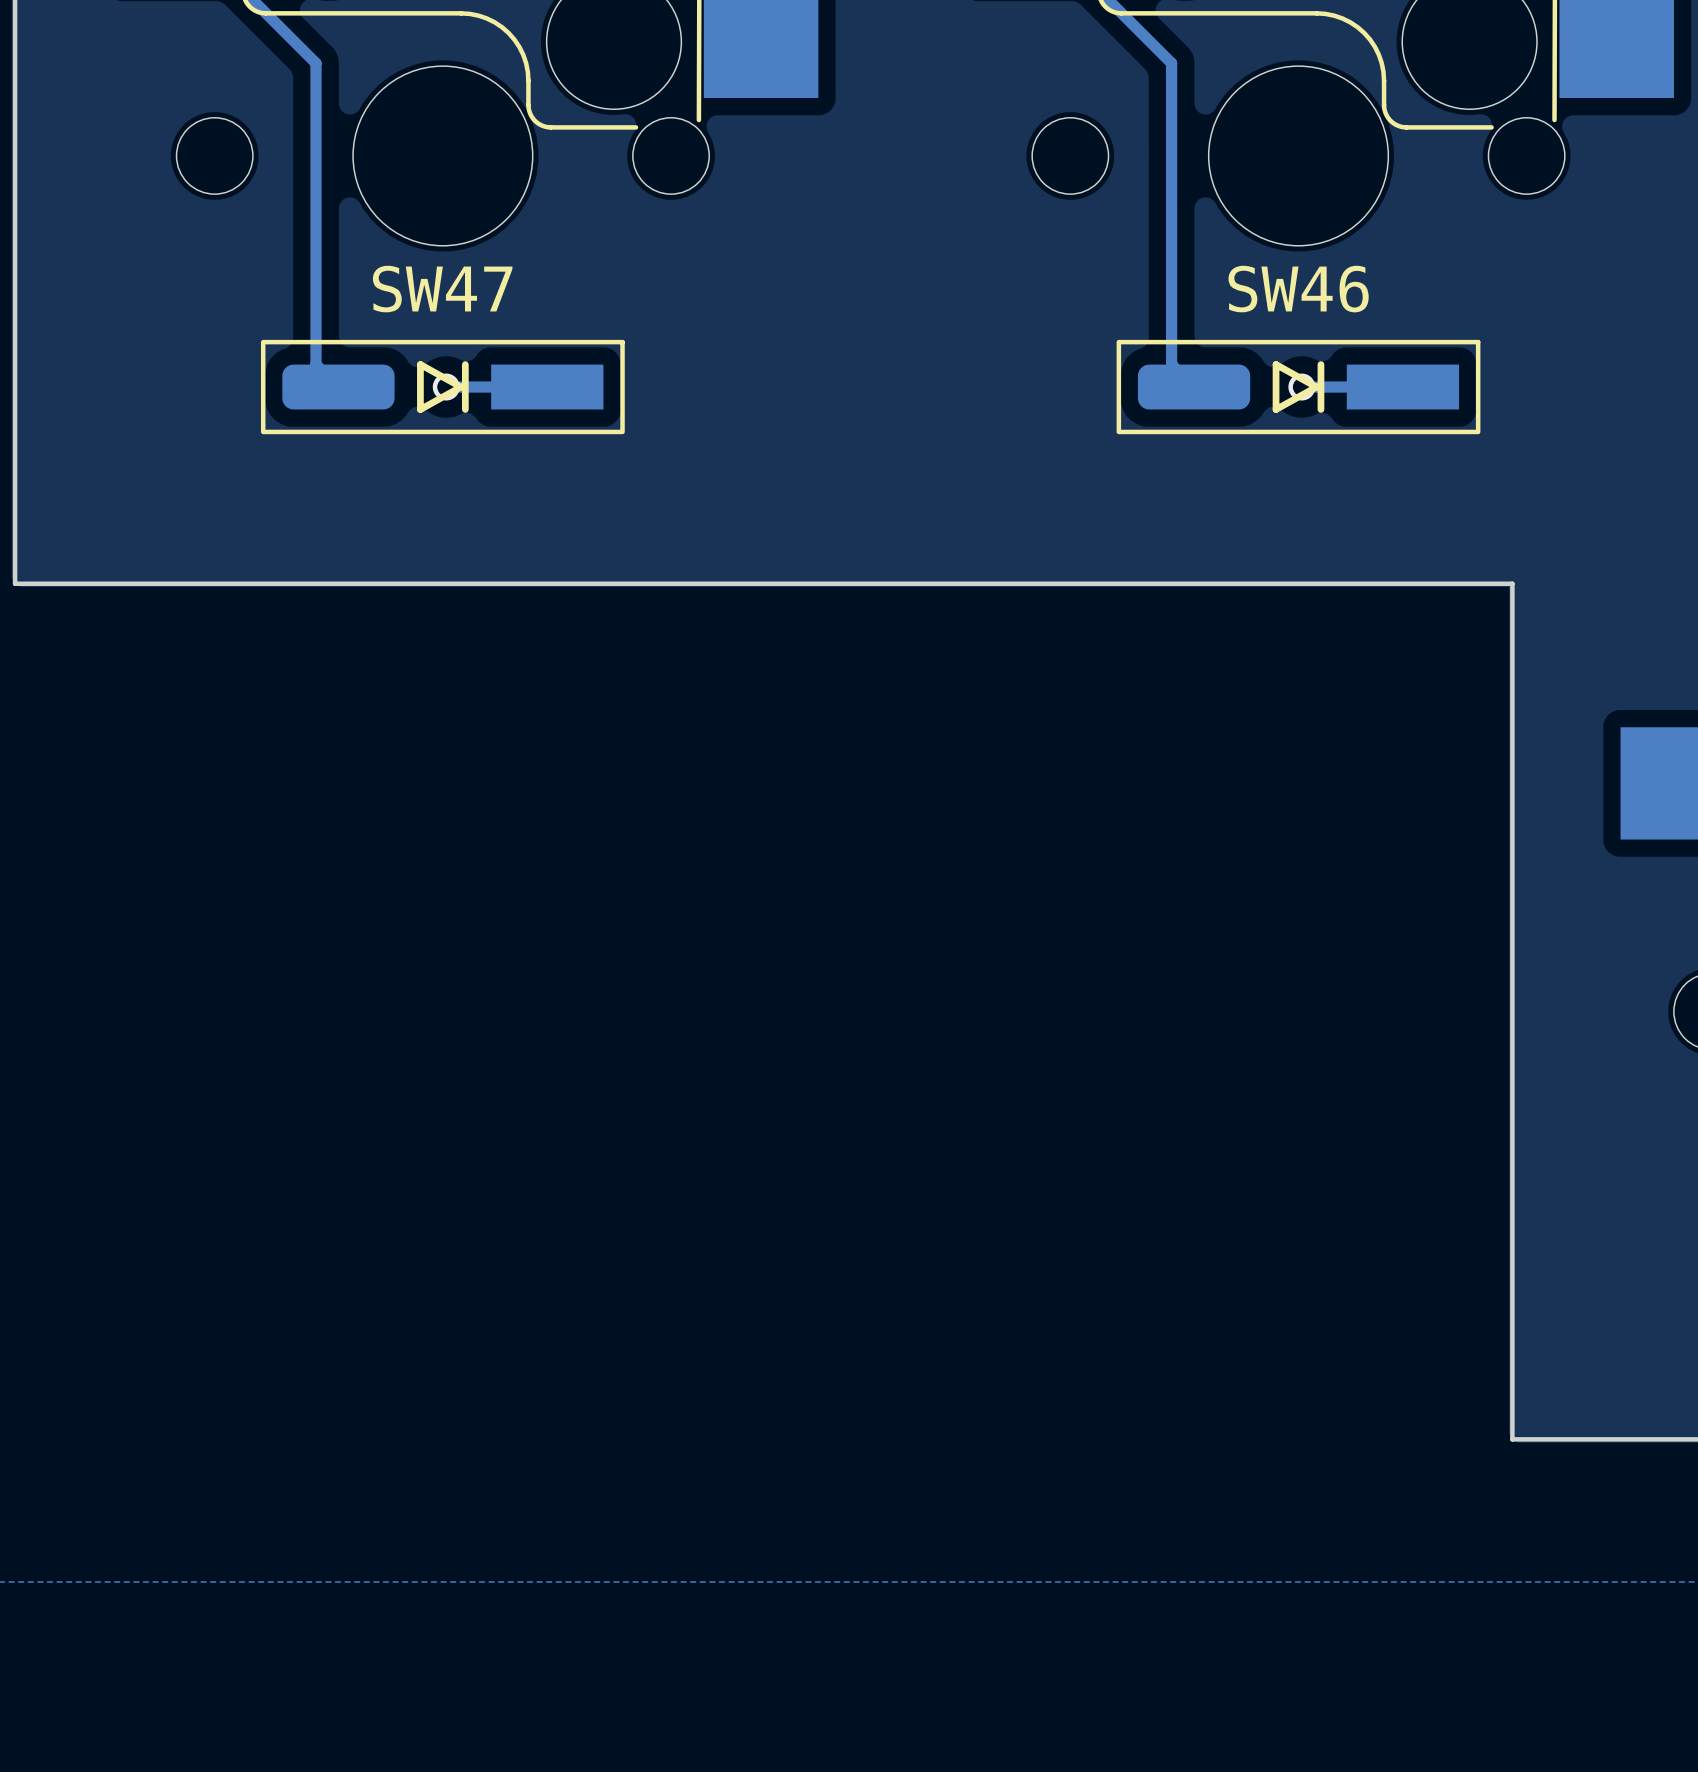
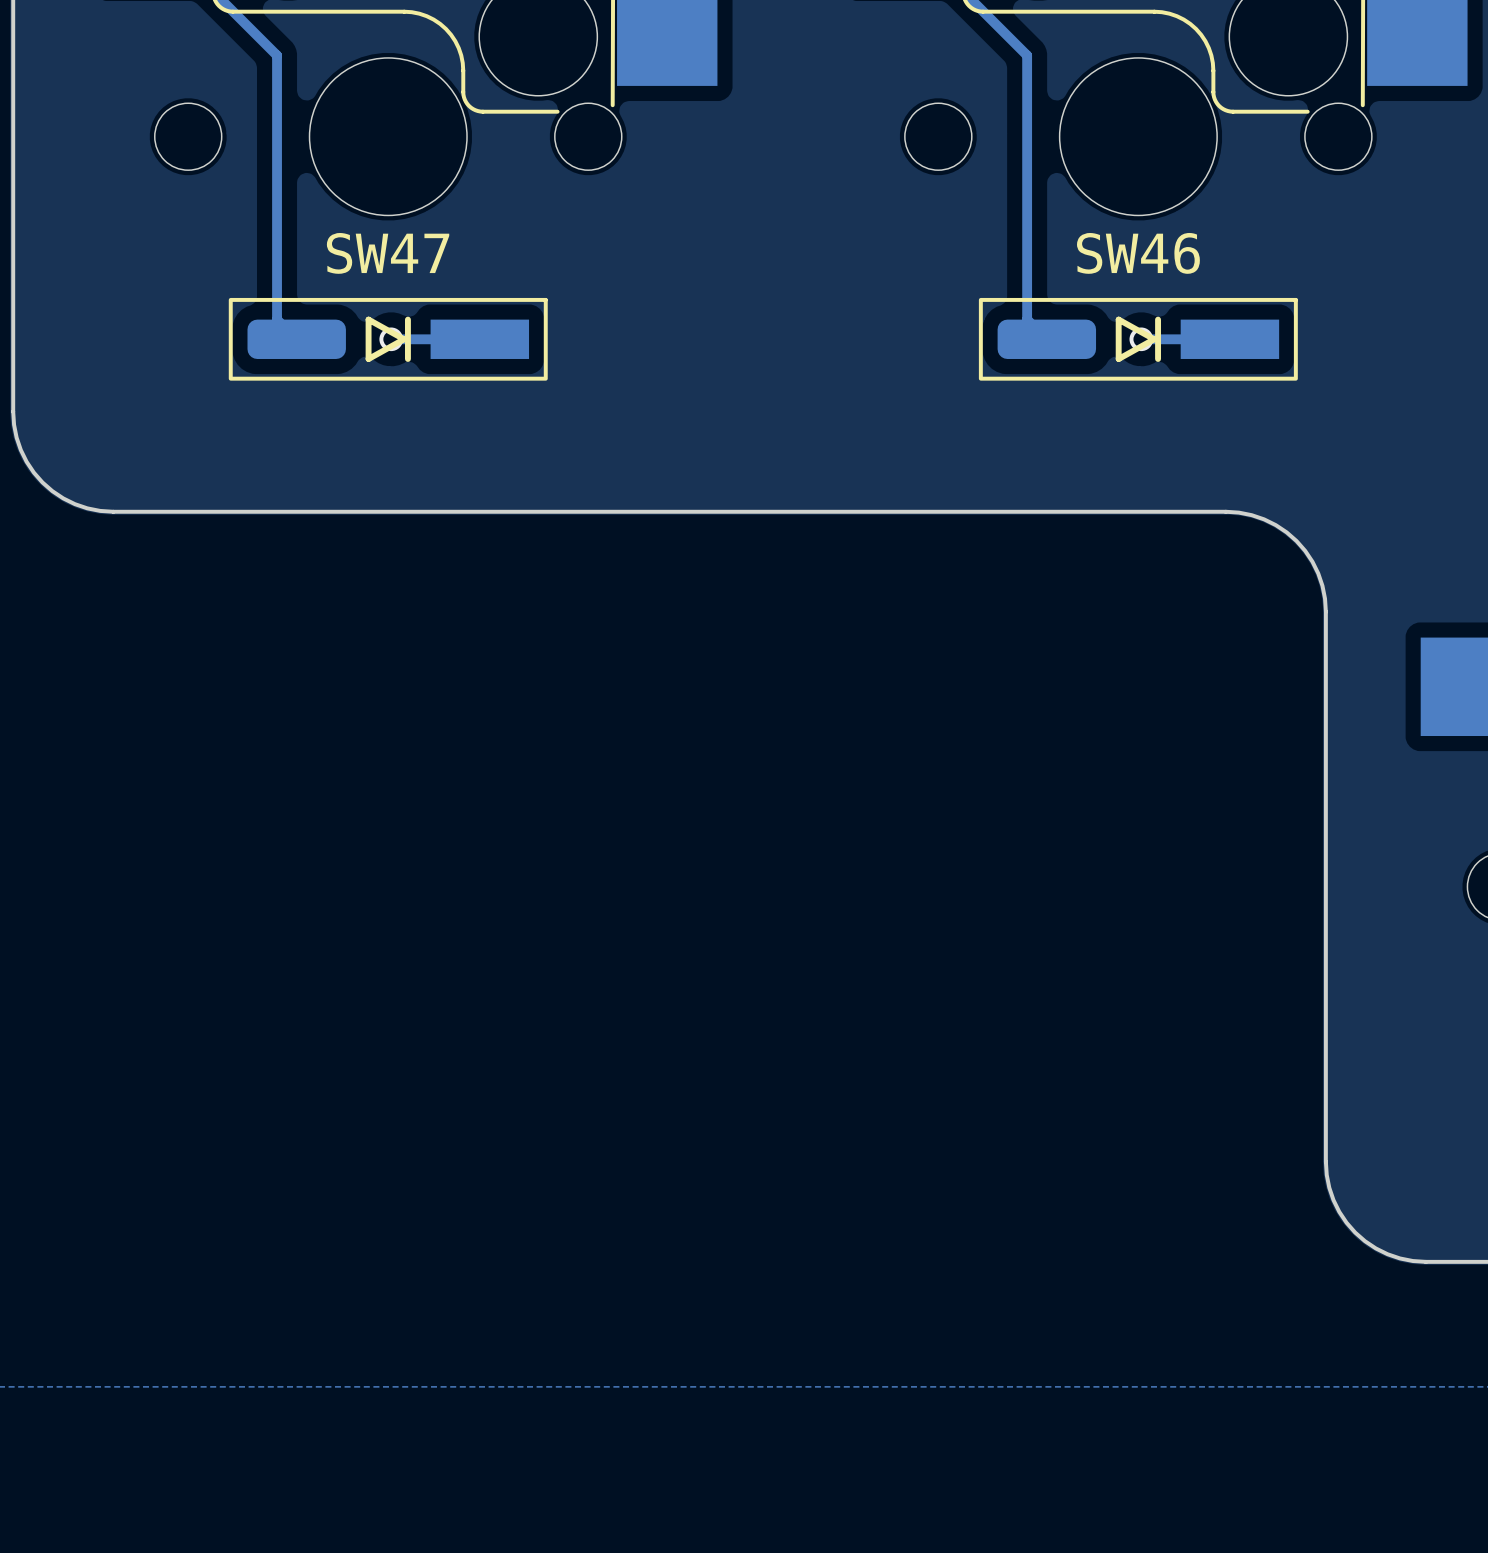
board edge: (15, 469) (15, 583) (129, 583) -> (13, 411) (16, 437) (20, 450) (26, 461) (42, 482) (63, 498) (74, 504) (87, 508) (113, 511)
board edge: (1398, 583) (1512, 583) (1512, 697) -> (1225, 511) (1238, 512) (1264, 519) (1286, 532) (1296, 541) (1305, 550) (1318, 573) (1322, 585) (1325, 611)
board edge: (1512, 1325) (1512, 1439) (1626, 1439) -> (1325, 1161) (1326, 1174) (1333, 1200) (1346, 1222) (1355, 1232) (1375, 1248) (1387, 1254) (1412, 1261) (1425, 1261)

